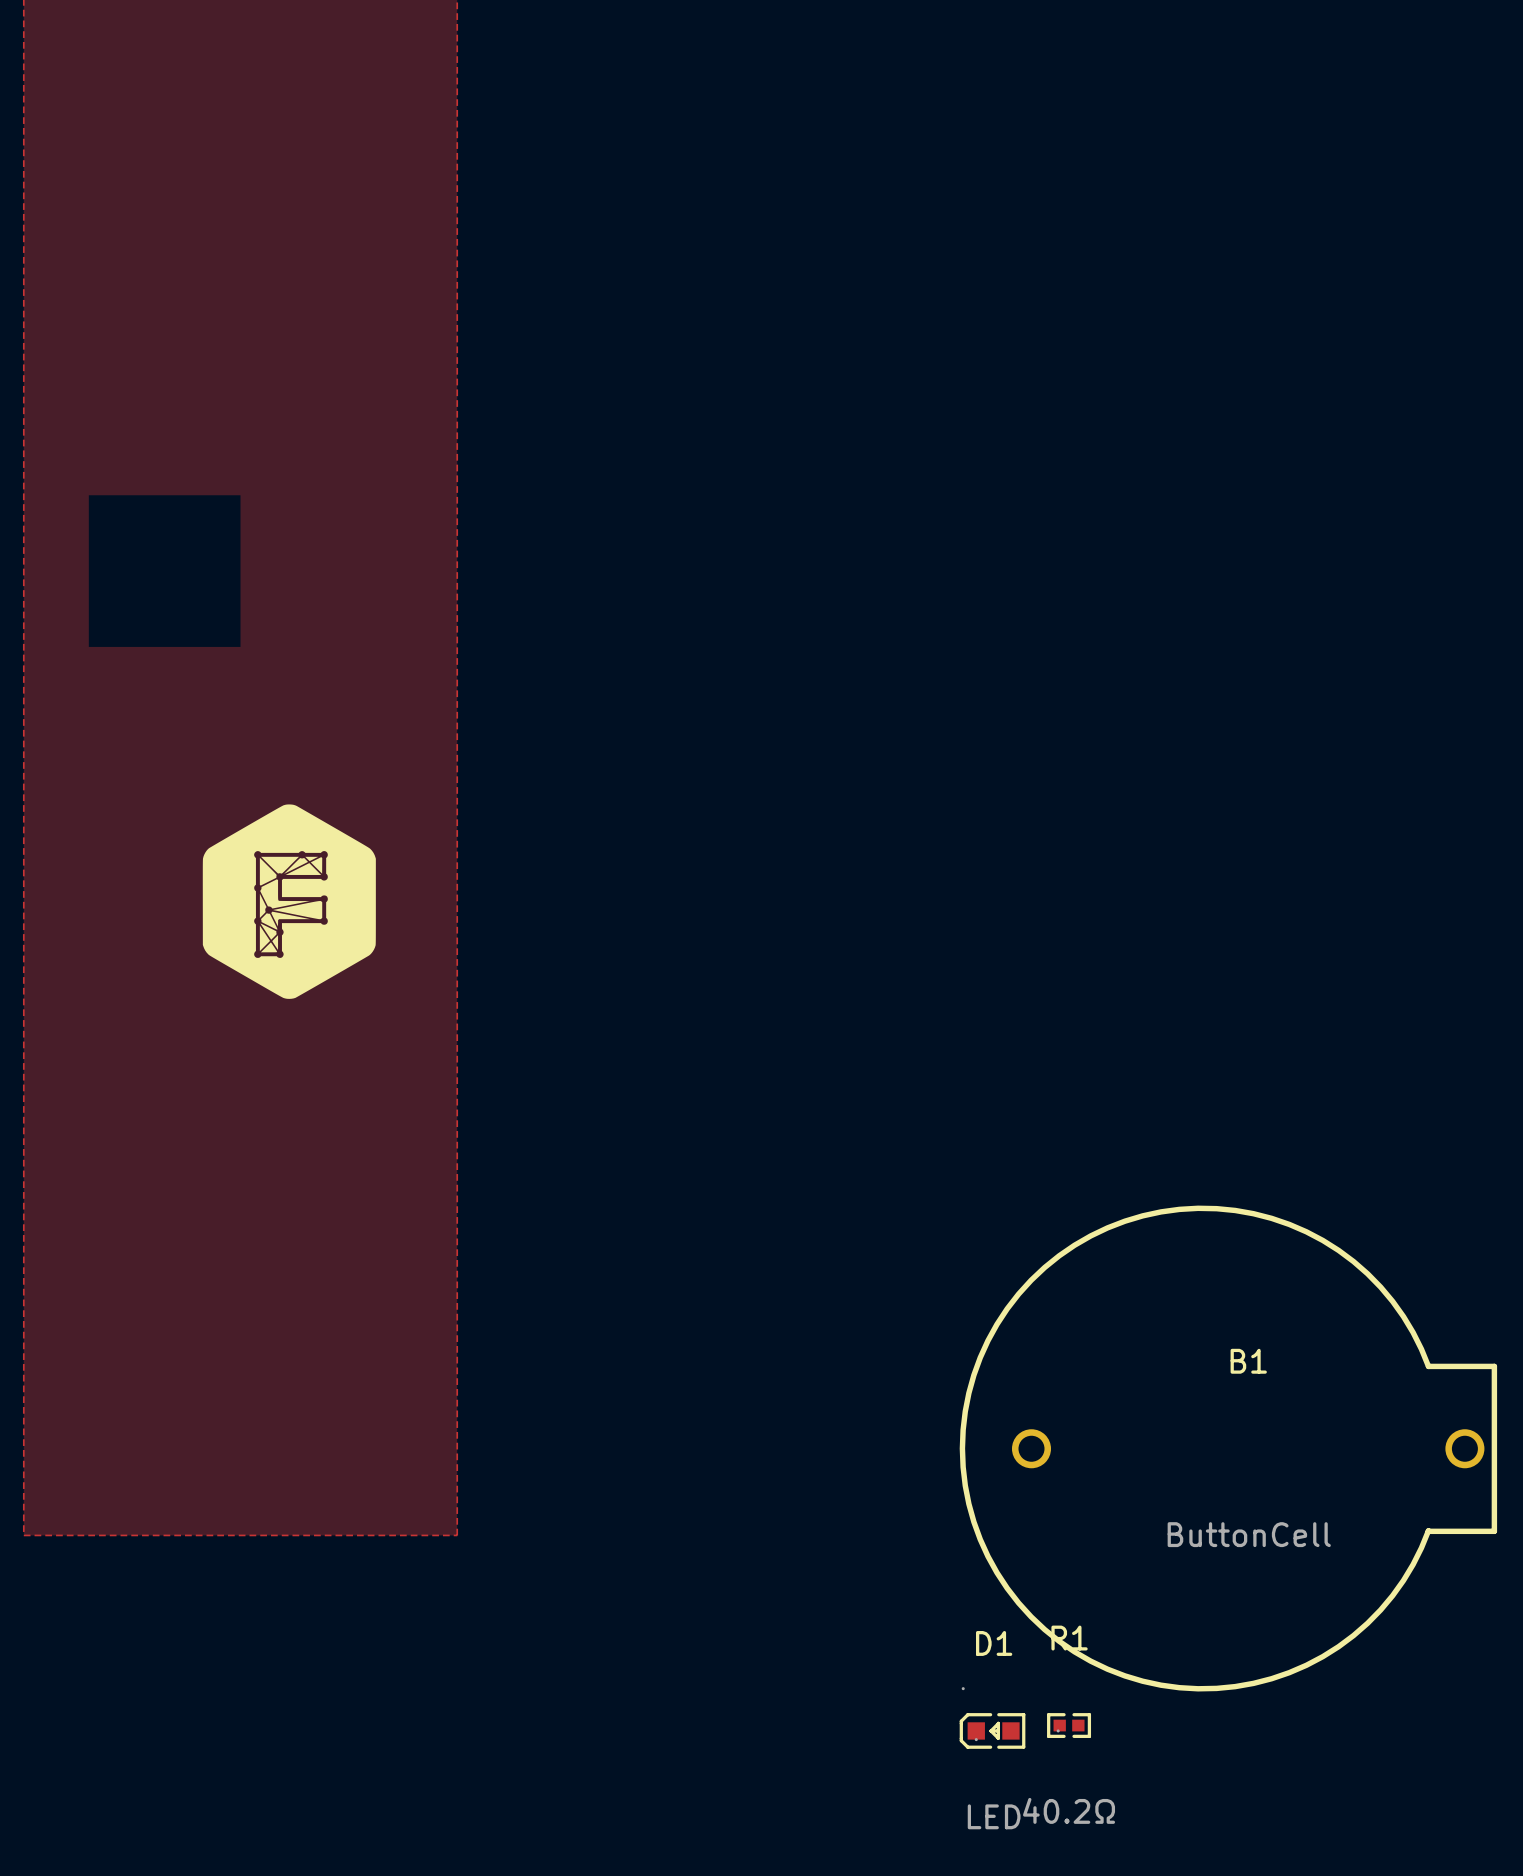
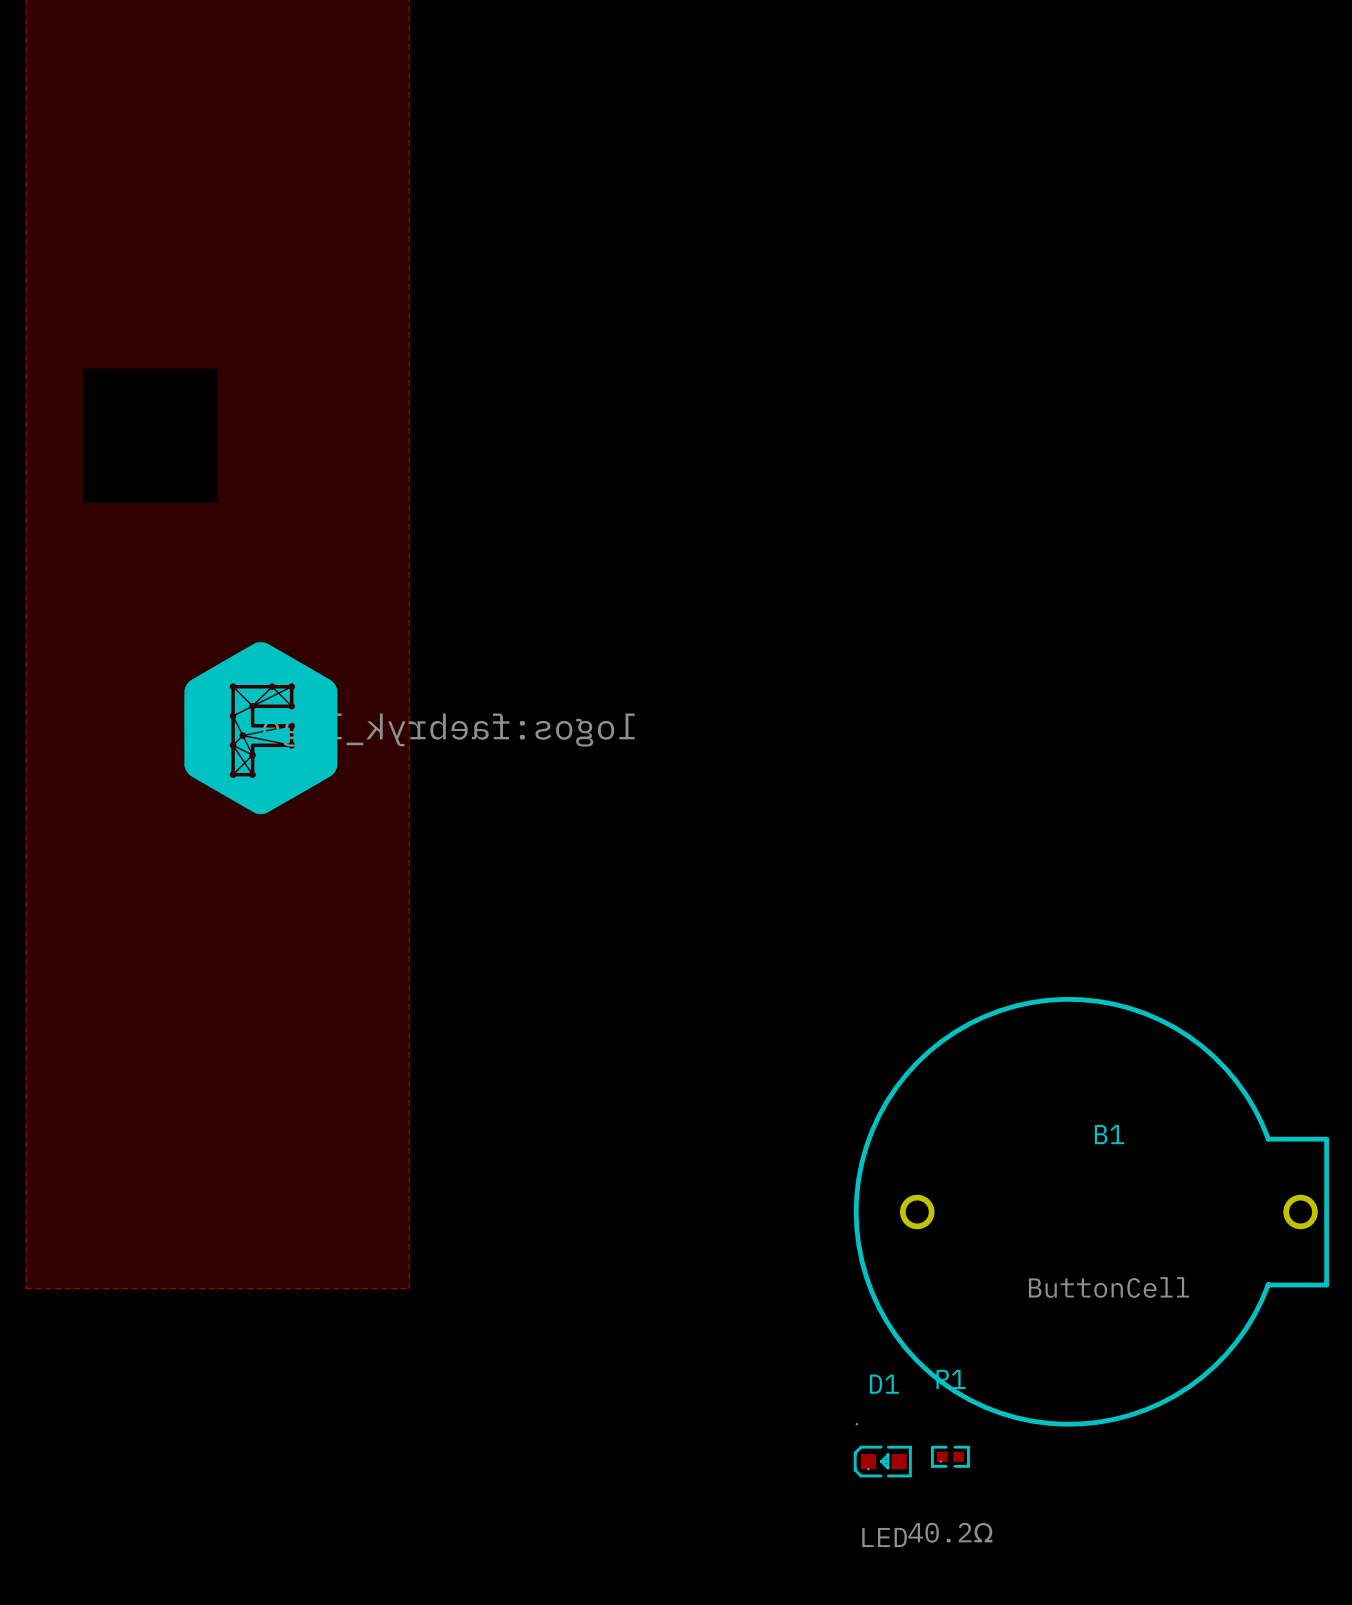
drawing shape: [202, 804, 376, 999] -> [184, 642, 635, 815]

